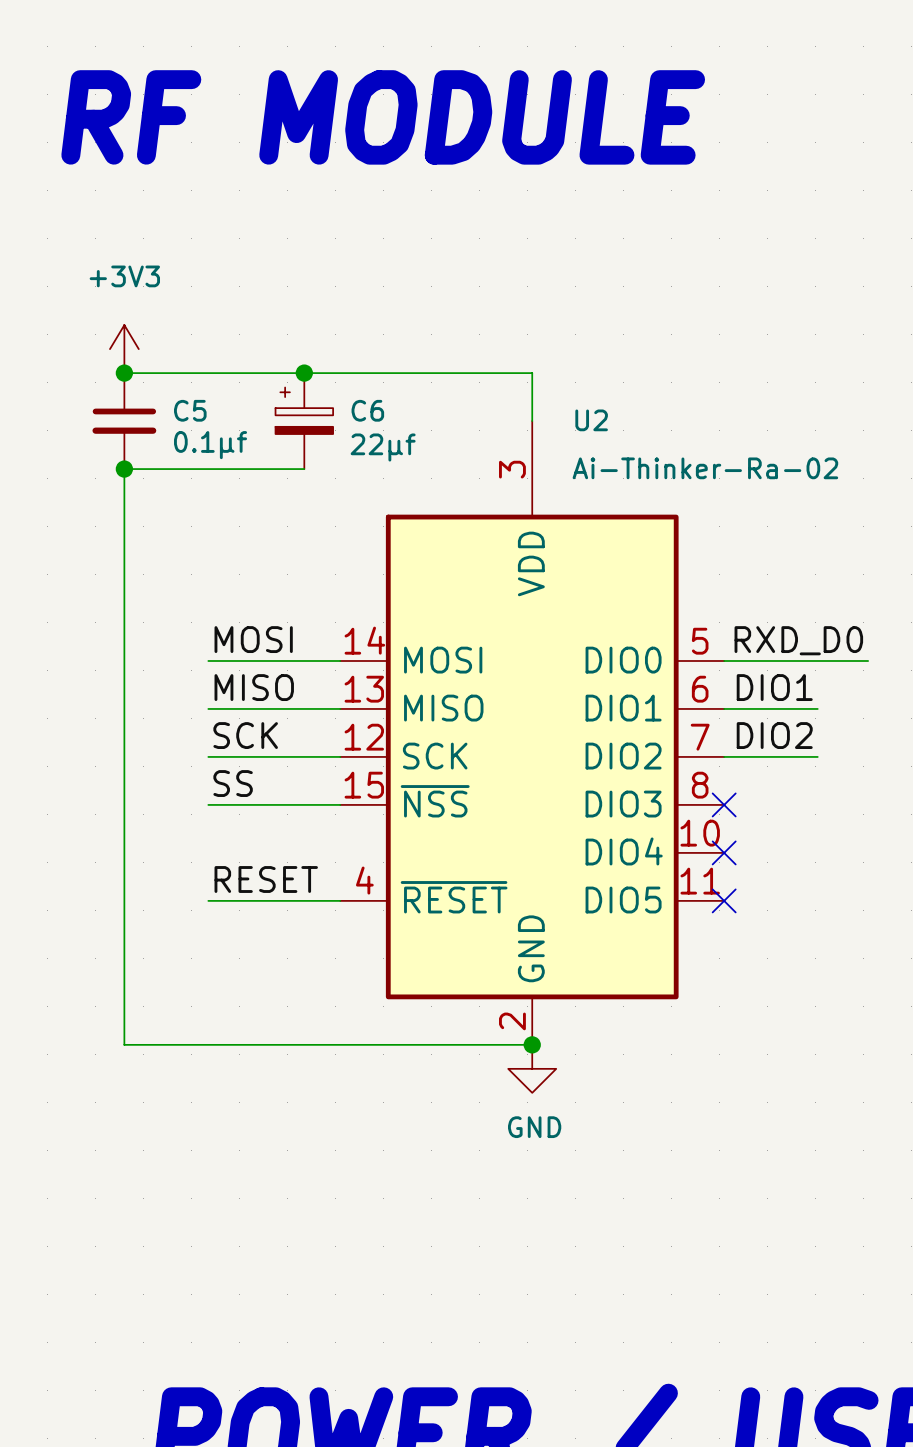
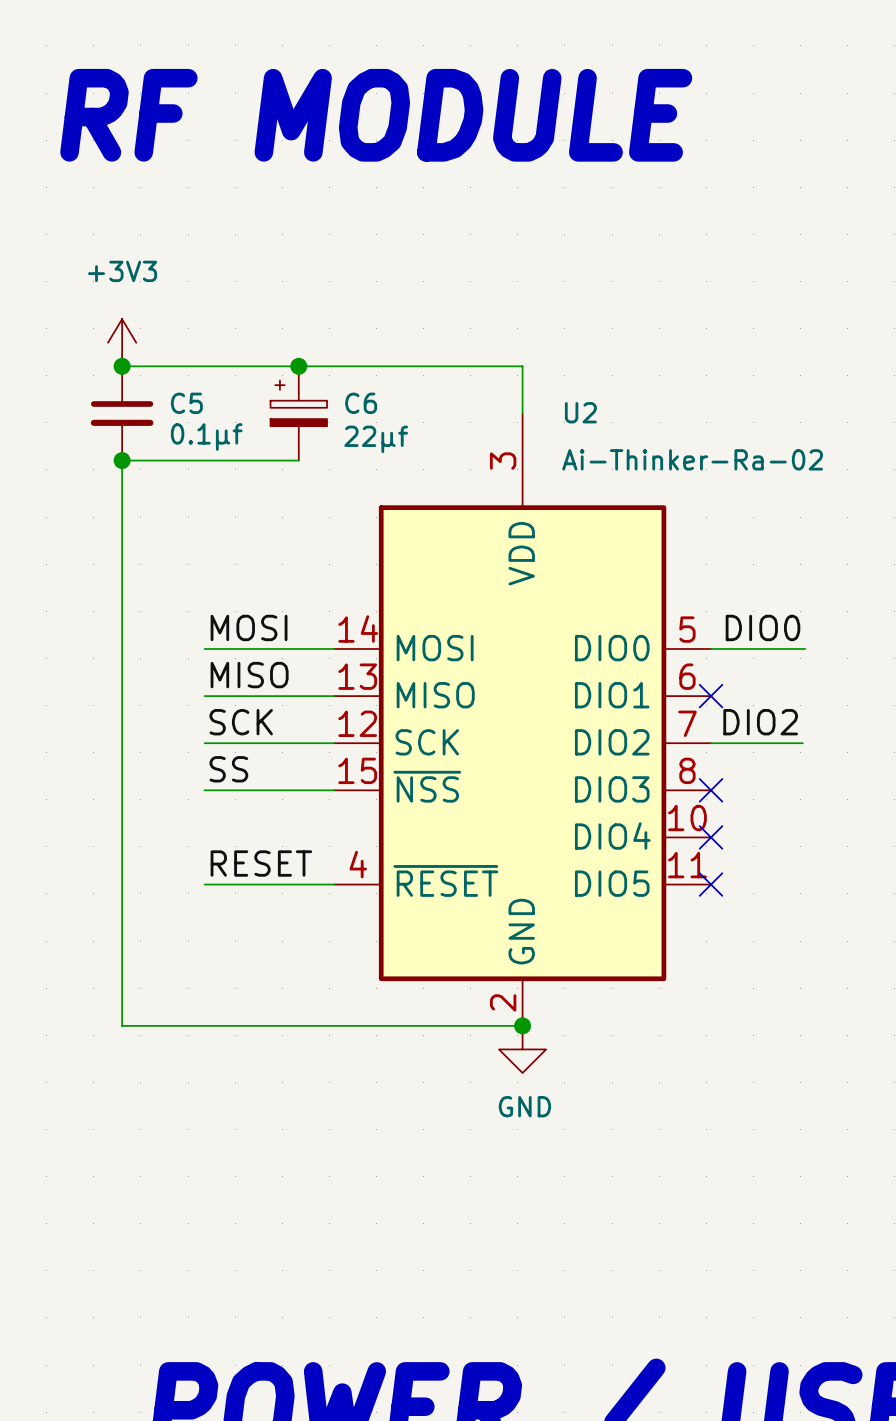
label: RXD_D0 (798, 640) -> none
wire: (820, 660) (868, 660) -> none
label: DIO1 (774, 687) -> DIO0 (762, 627)
wire: (724, 708) (817, 708) -> none
no-connect mark: none -> (711, 696)

